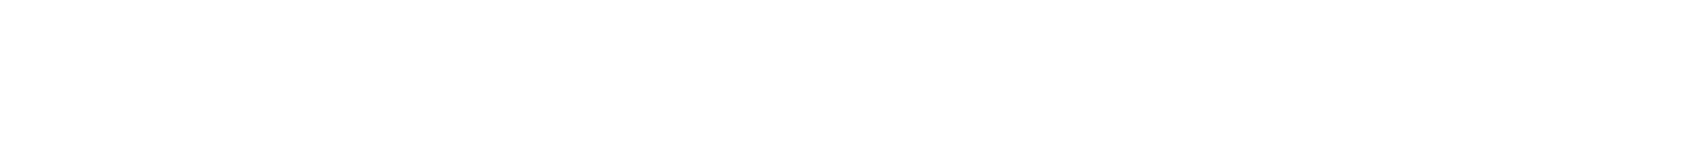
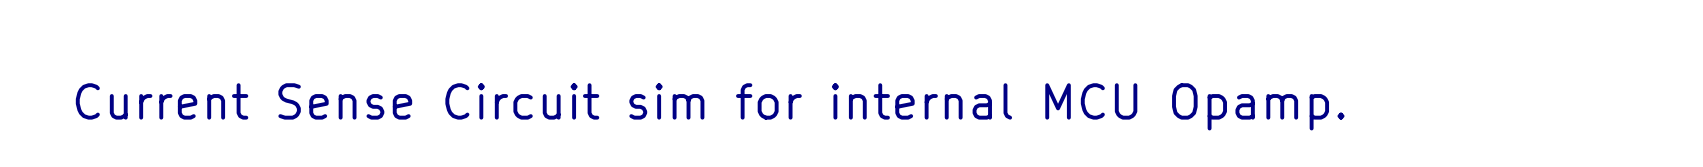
text: none -> Current Sense Circuit sim for internal MCU Opamp. (710, 106)

